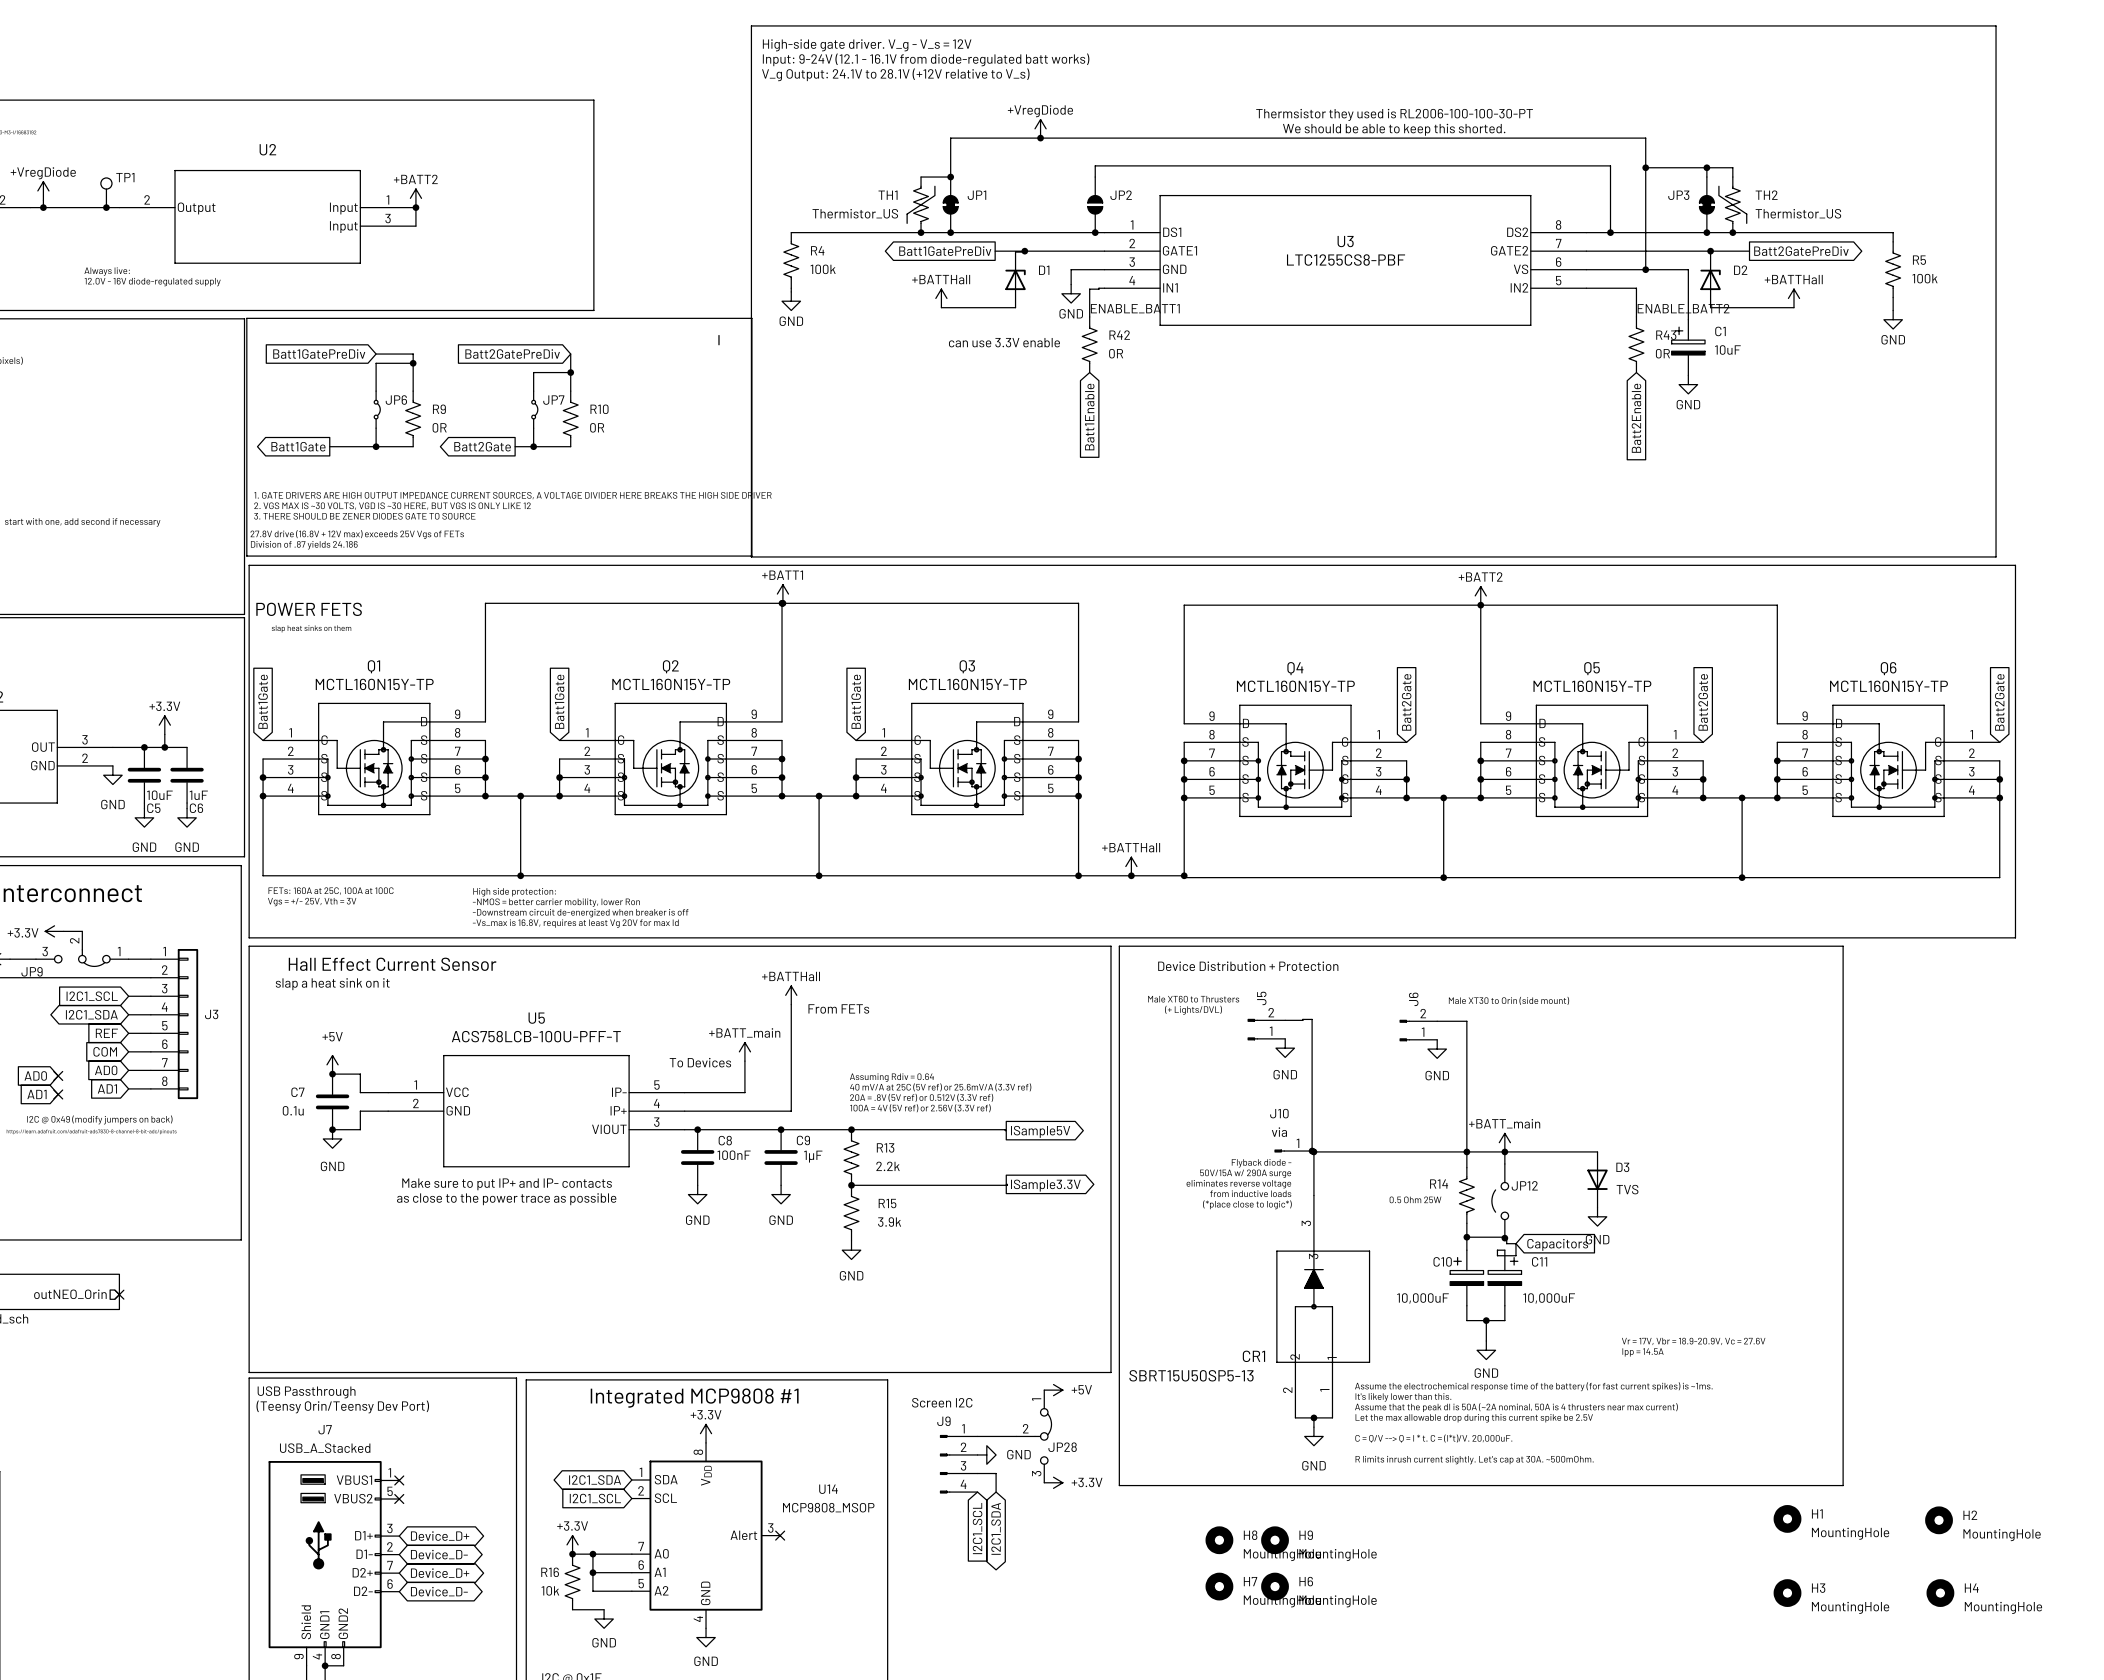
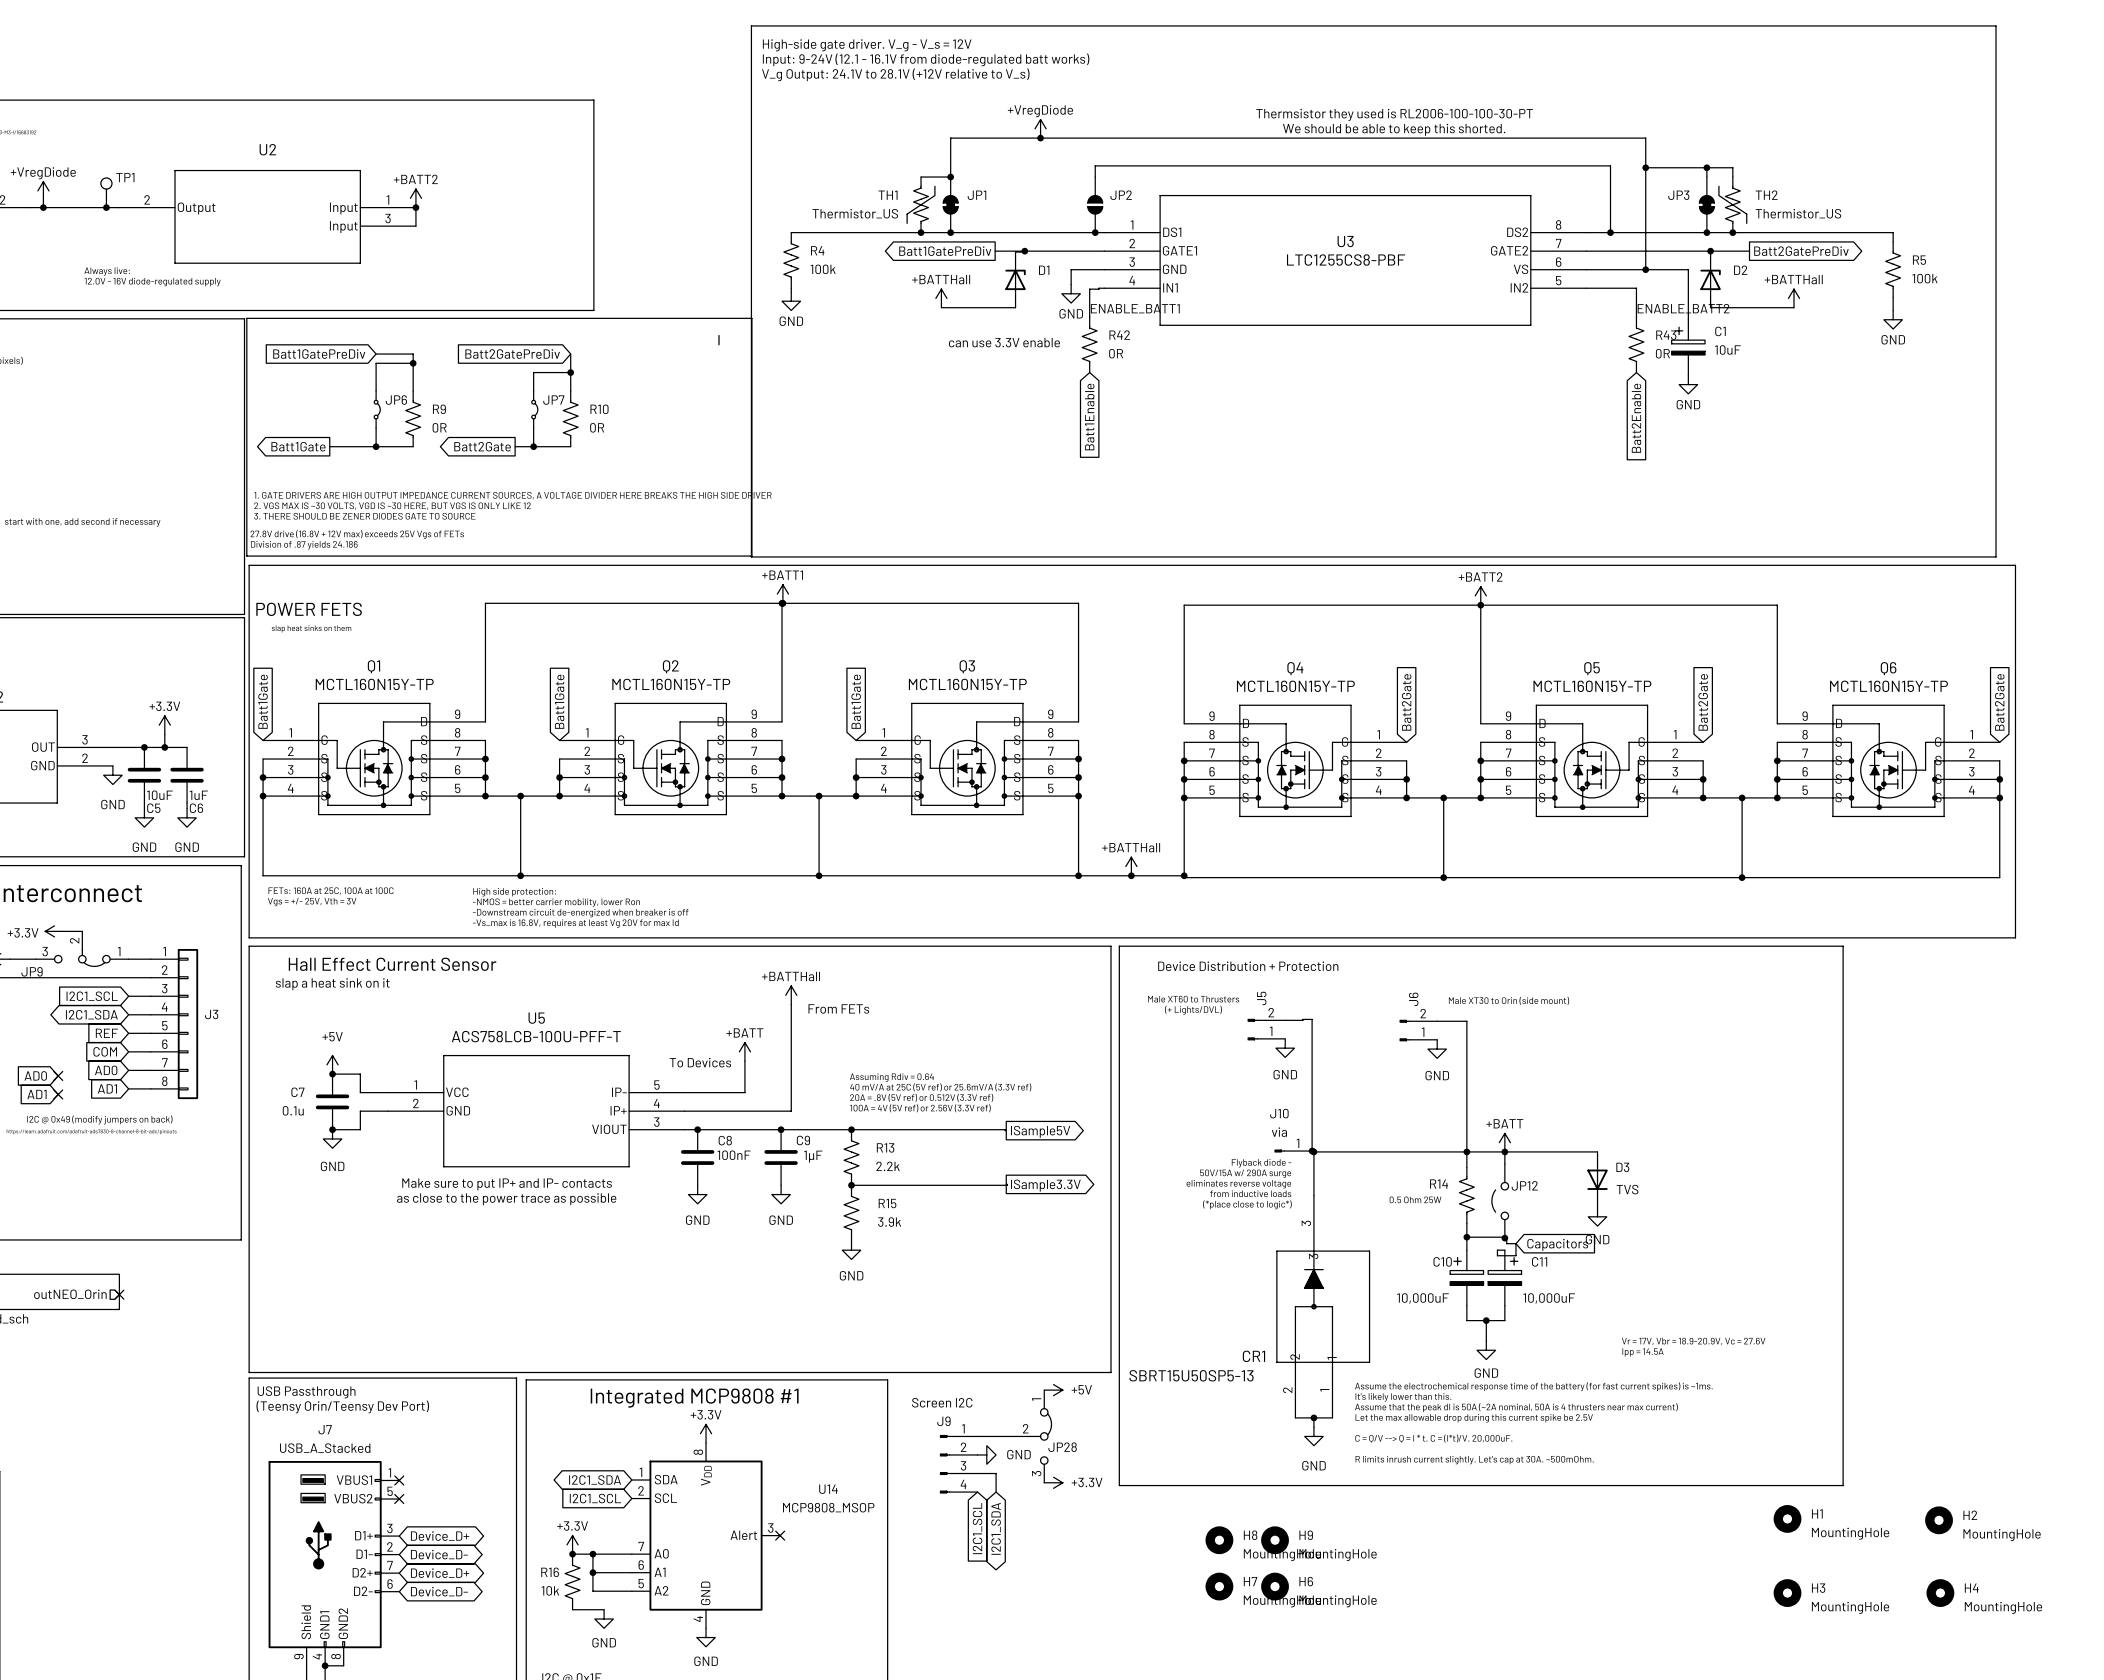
power symbol: +BATT_main (744, 1051) -> +BATT (744, 1051)
power symbol: +BATT_main (1504, 1142) -> +BATT (1504, 1142)

